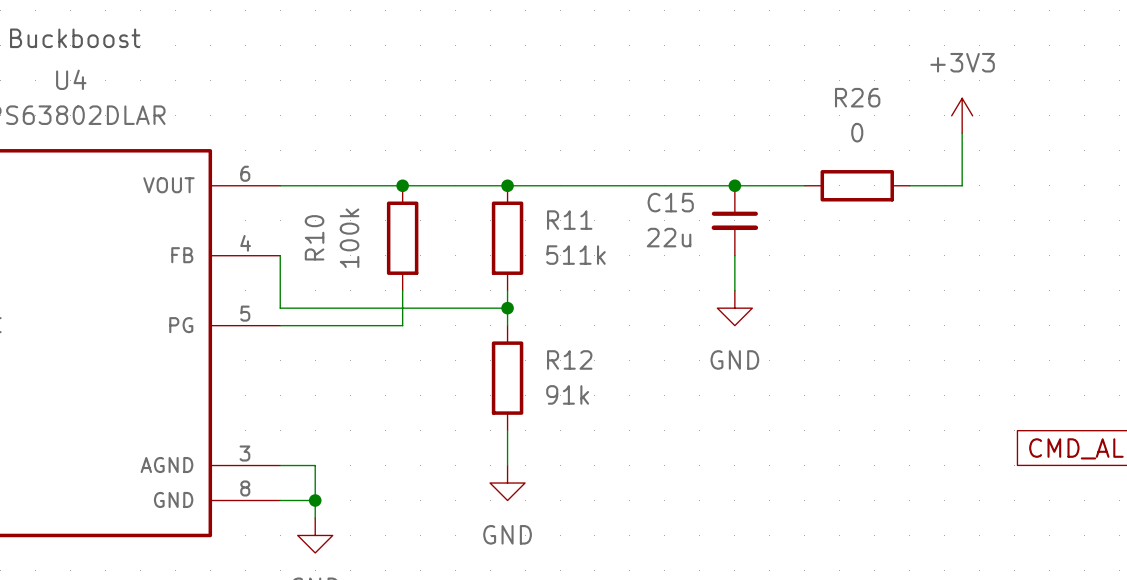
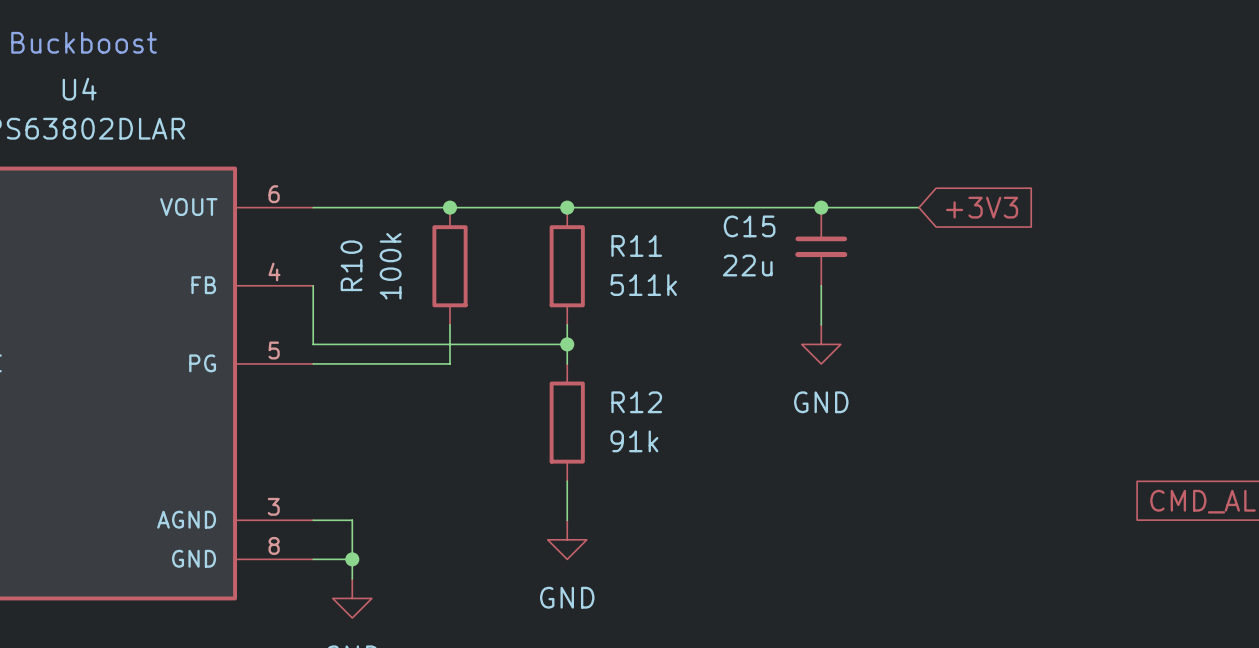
power symbol: +3V3 (962, 115) -> none
wire: (962, 133) (962, 185) (909, 185) -> none
R26: 0 (857, 185) -> none
global label: none -> +3V3 (982, 207)

